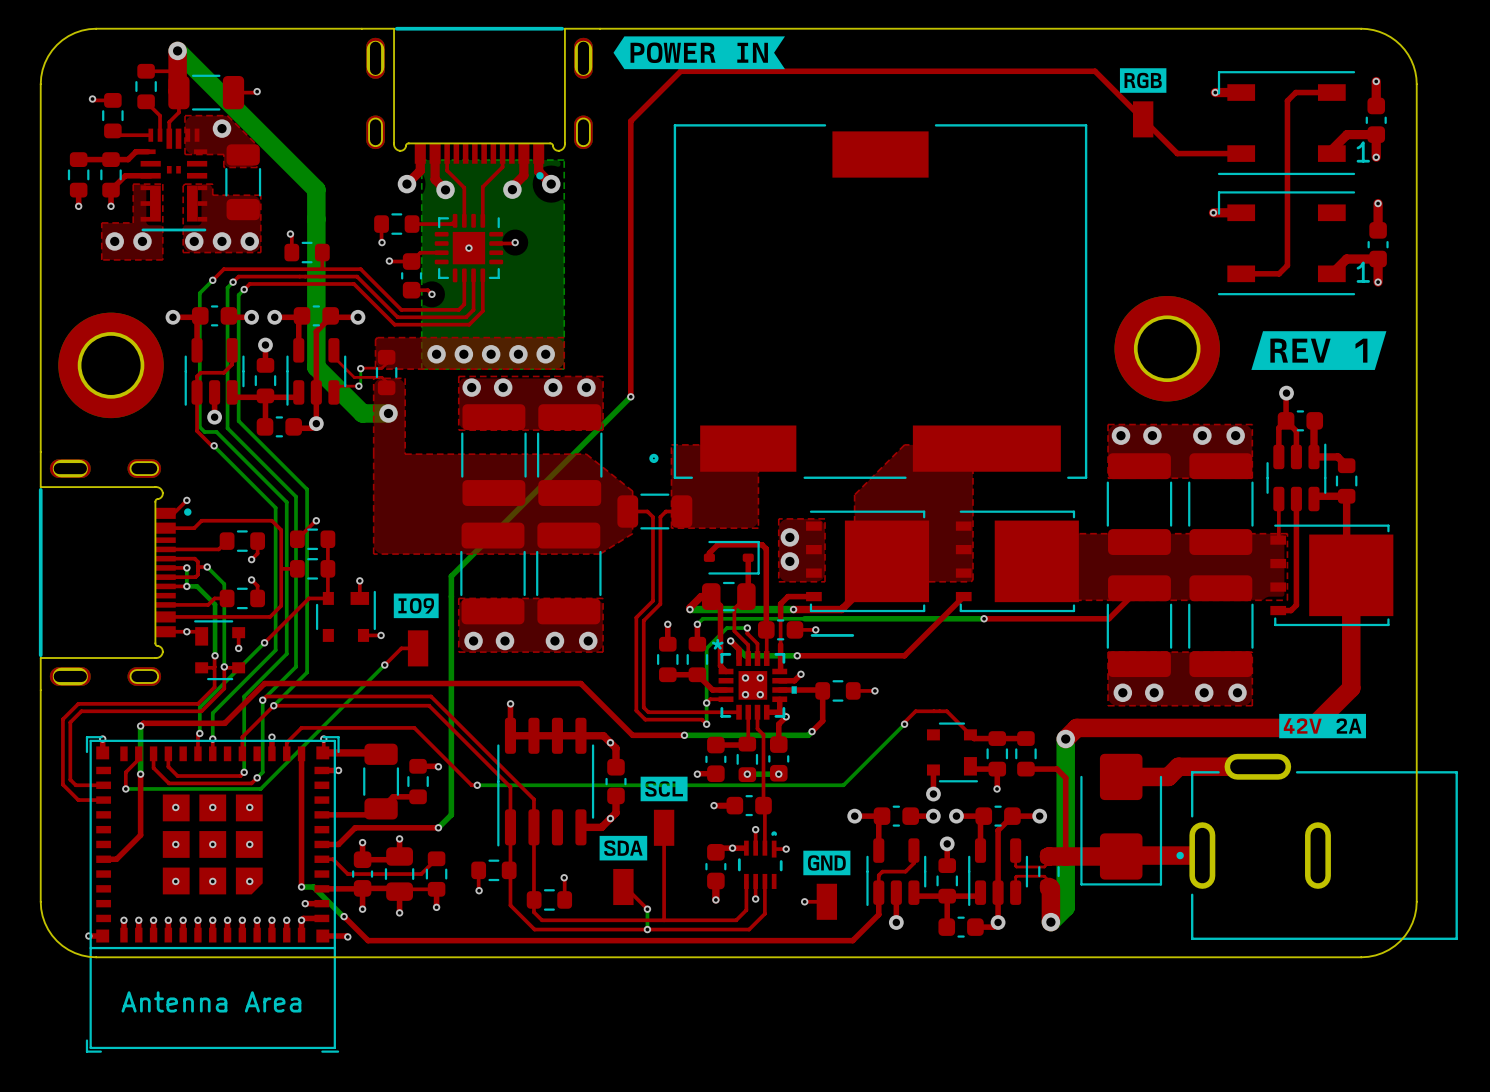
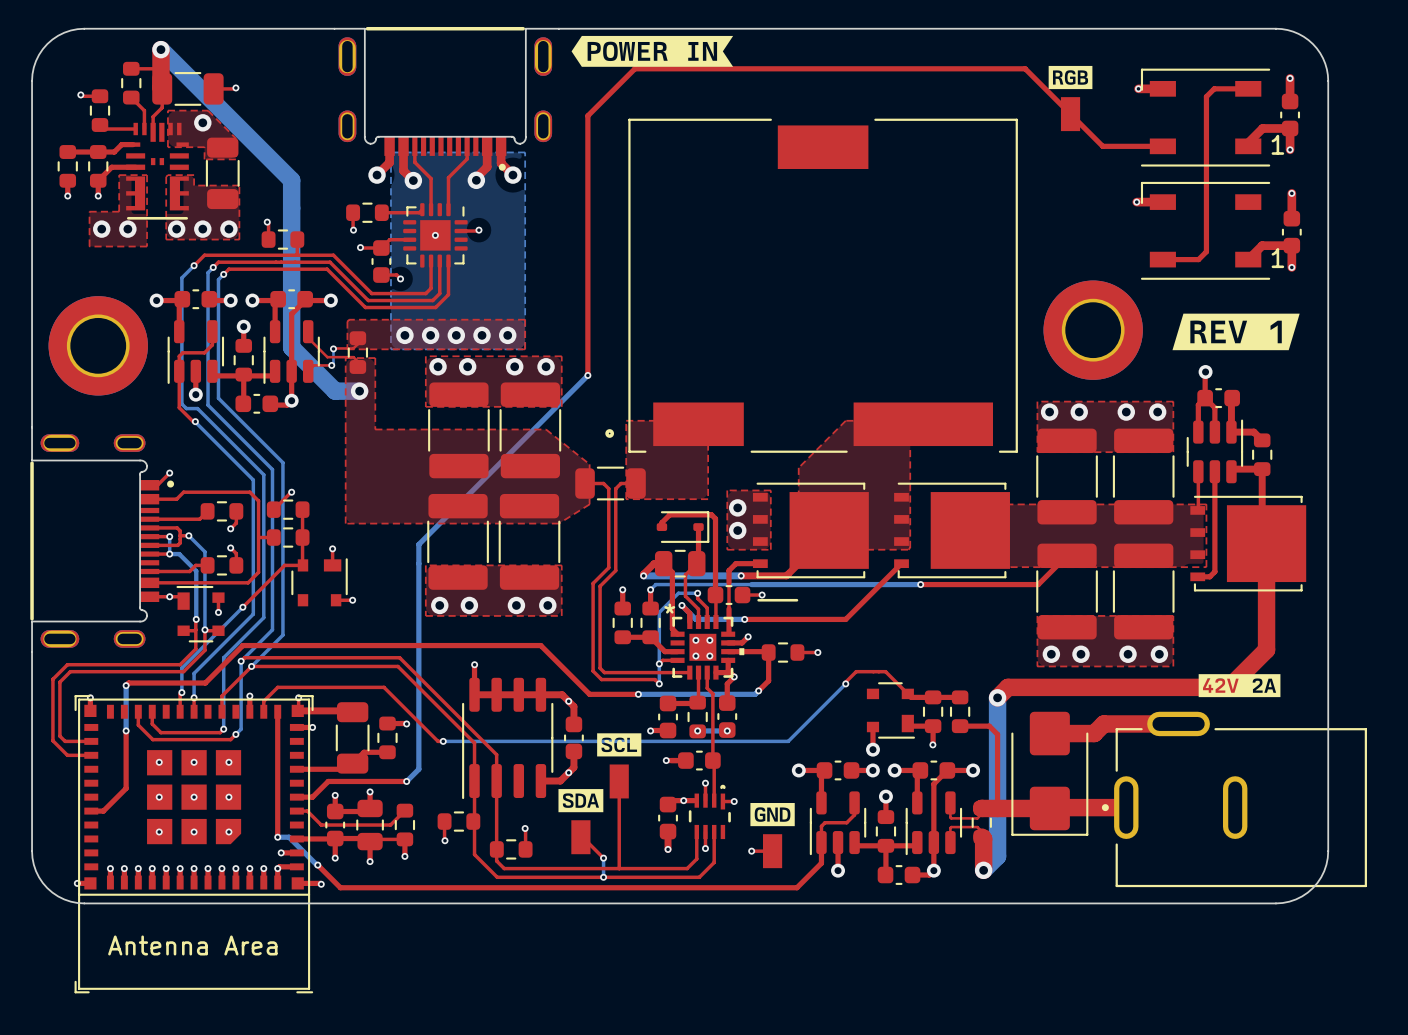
drawing: [393, 593, 439, 619] -> none
top track: (418, 648) (401, 648) (384, 665) -> none
part: (418, 648) -> none
bottom track: (384, 665) (260, 788) (125, 788) -> none
via: (384, 665) -> none
top track: (138, 753) (138, 759) (125, 772) (125, 788) -> none
via: (125, 788) -> none

